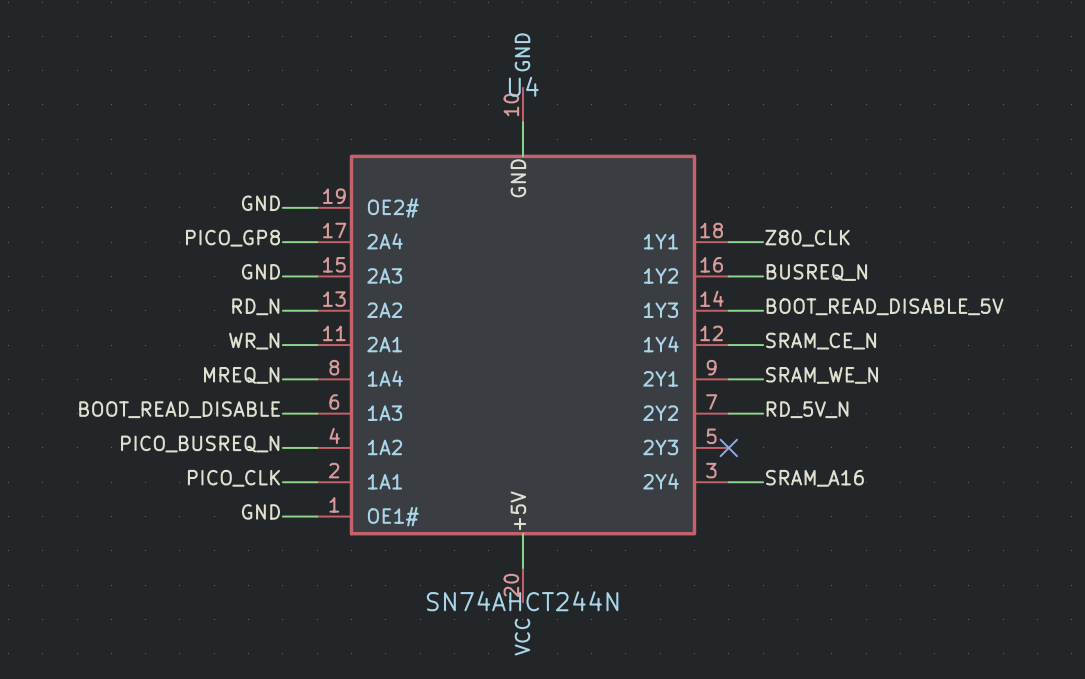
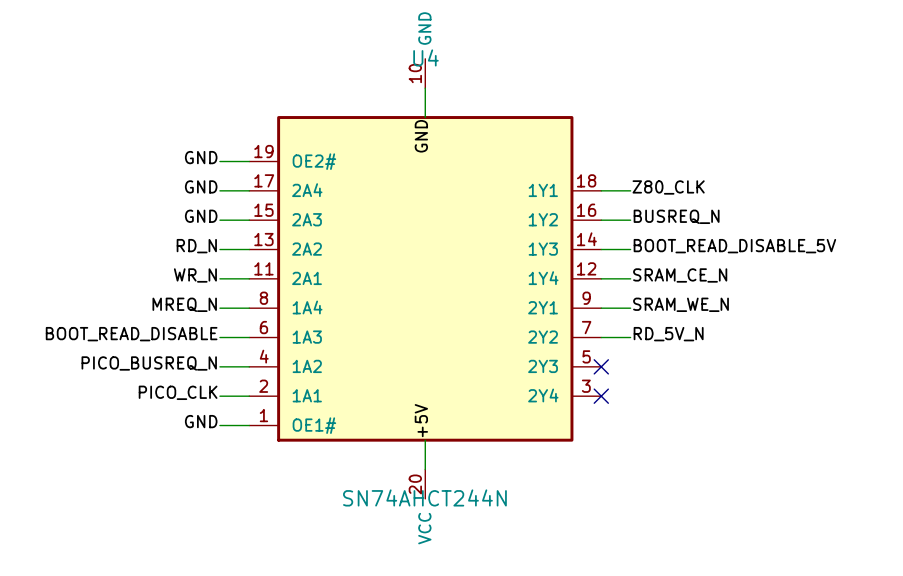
label: PICO_GP8 (232, 238) -> GND (201, 186)
label: SRAM_A16 (814, 478) -> none
wire: (728, 482) (763, 482) -> none
no-connect mark: none -> (601, 396)

